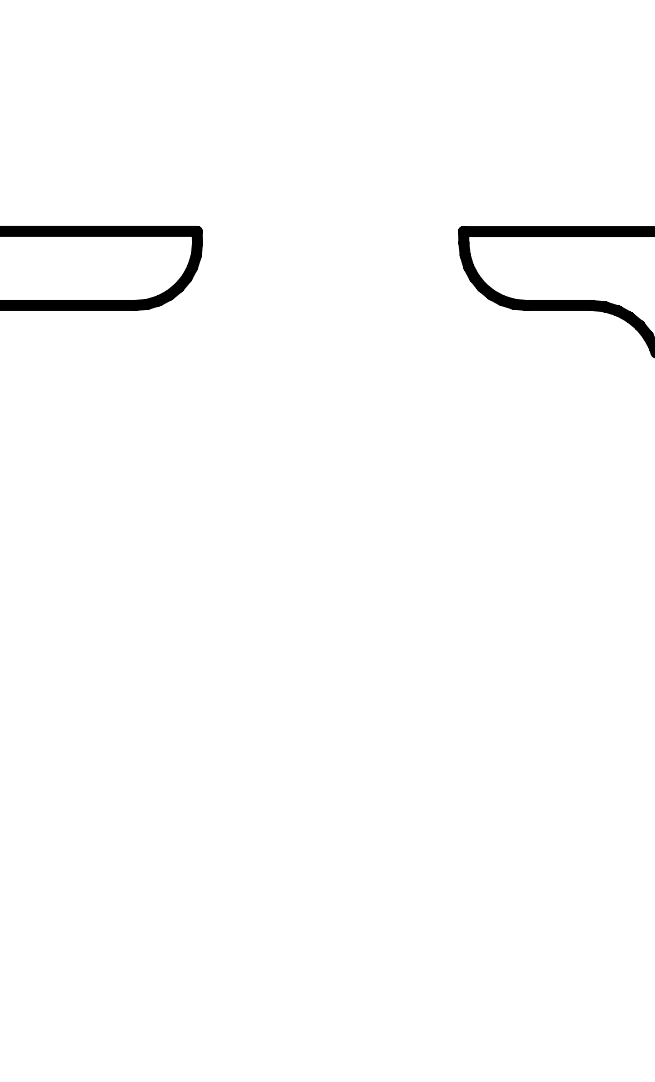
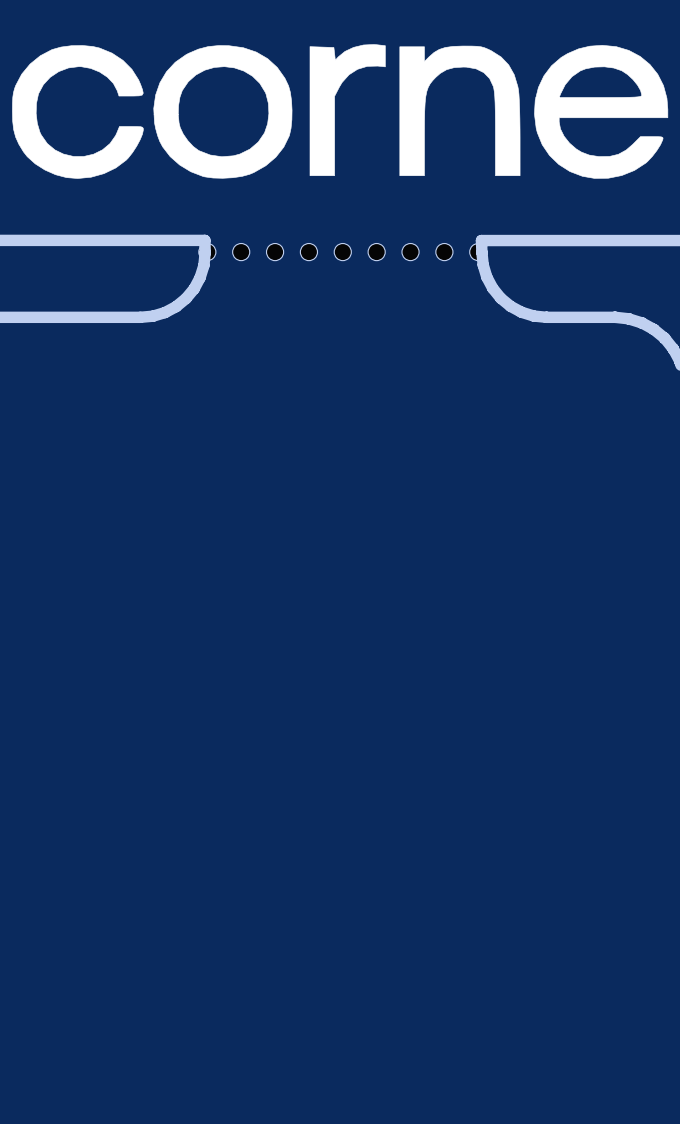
drawing: none -> [12, 44, 669, 179]
part: none -> (342, 252)

